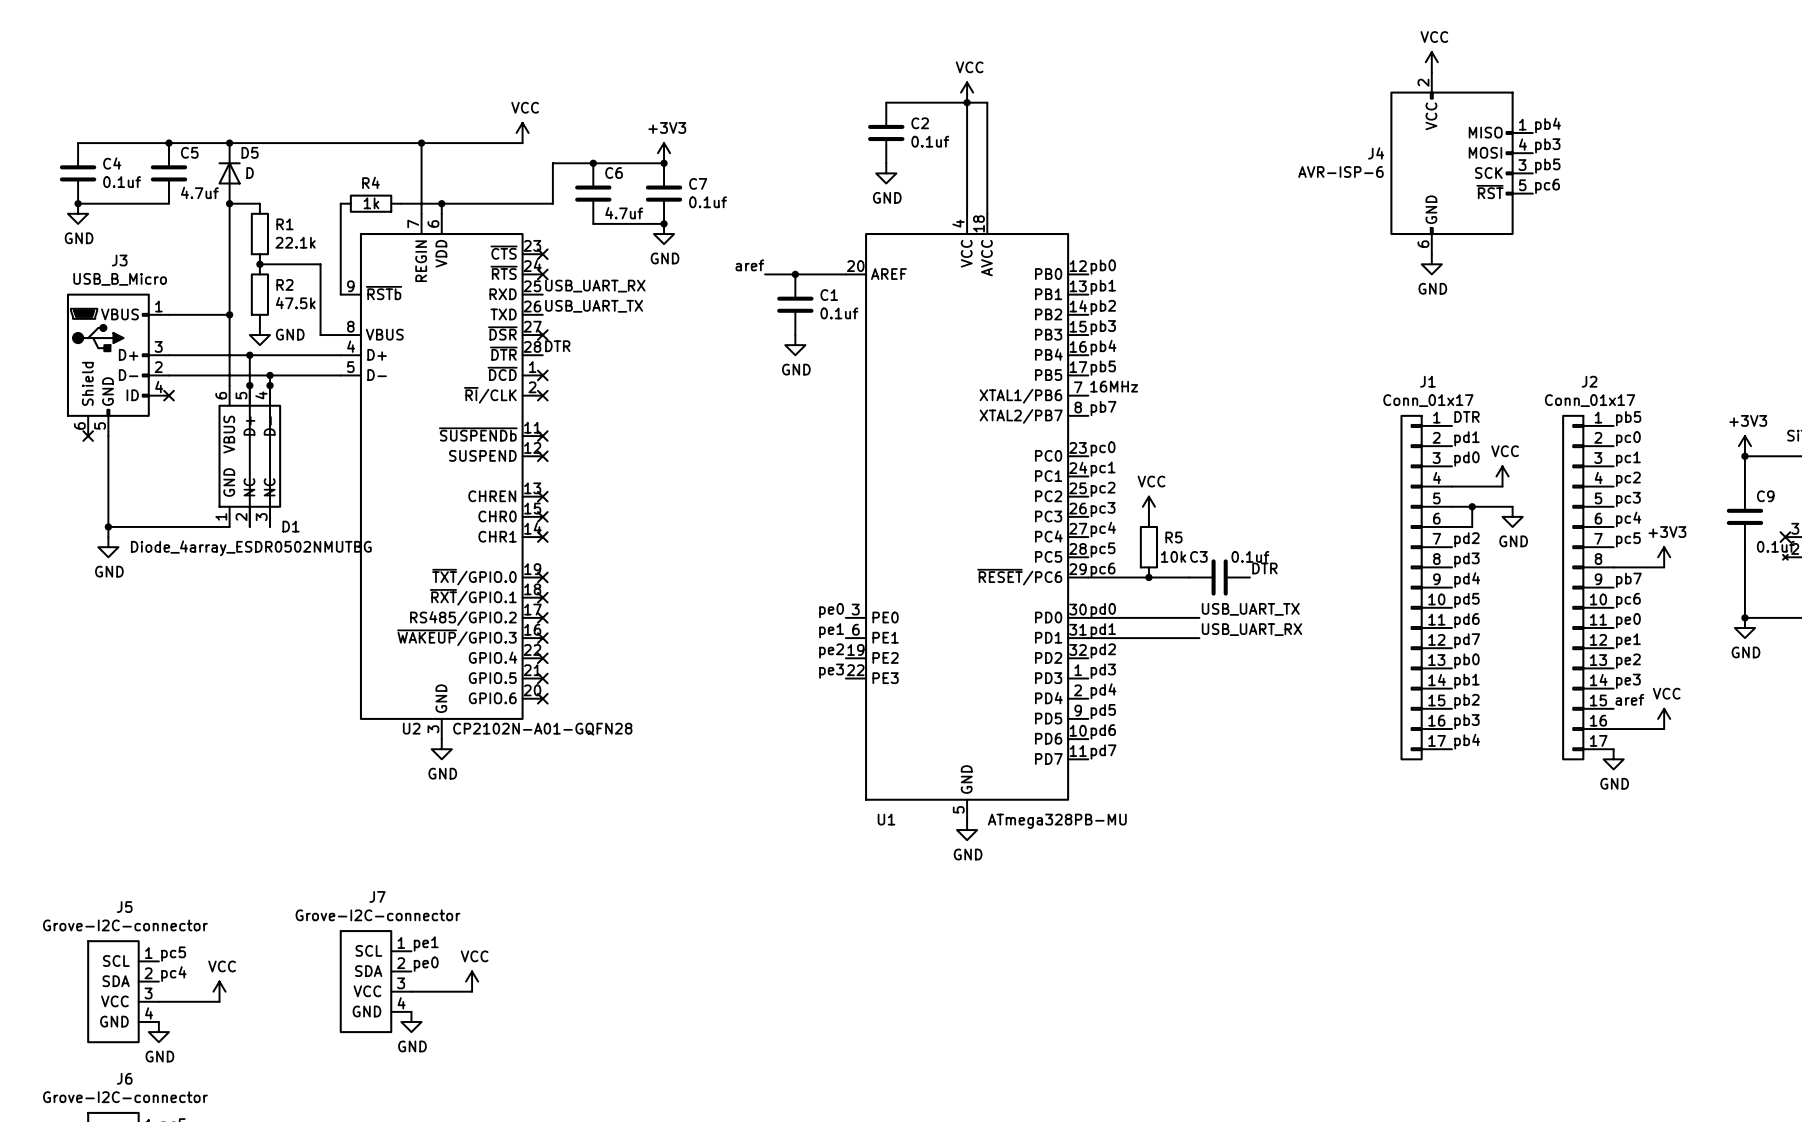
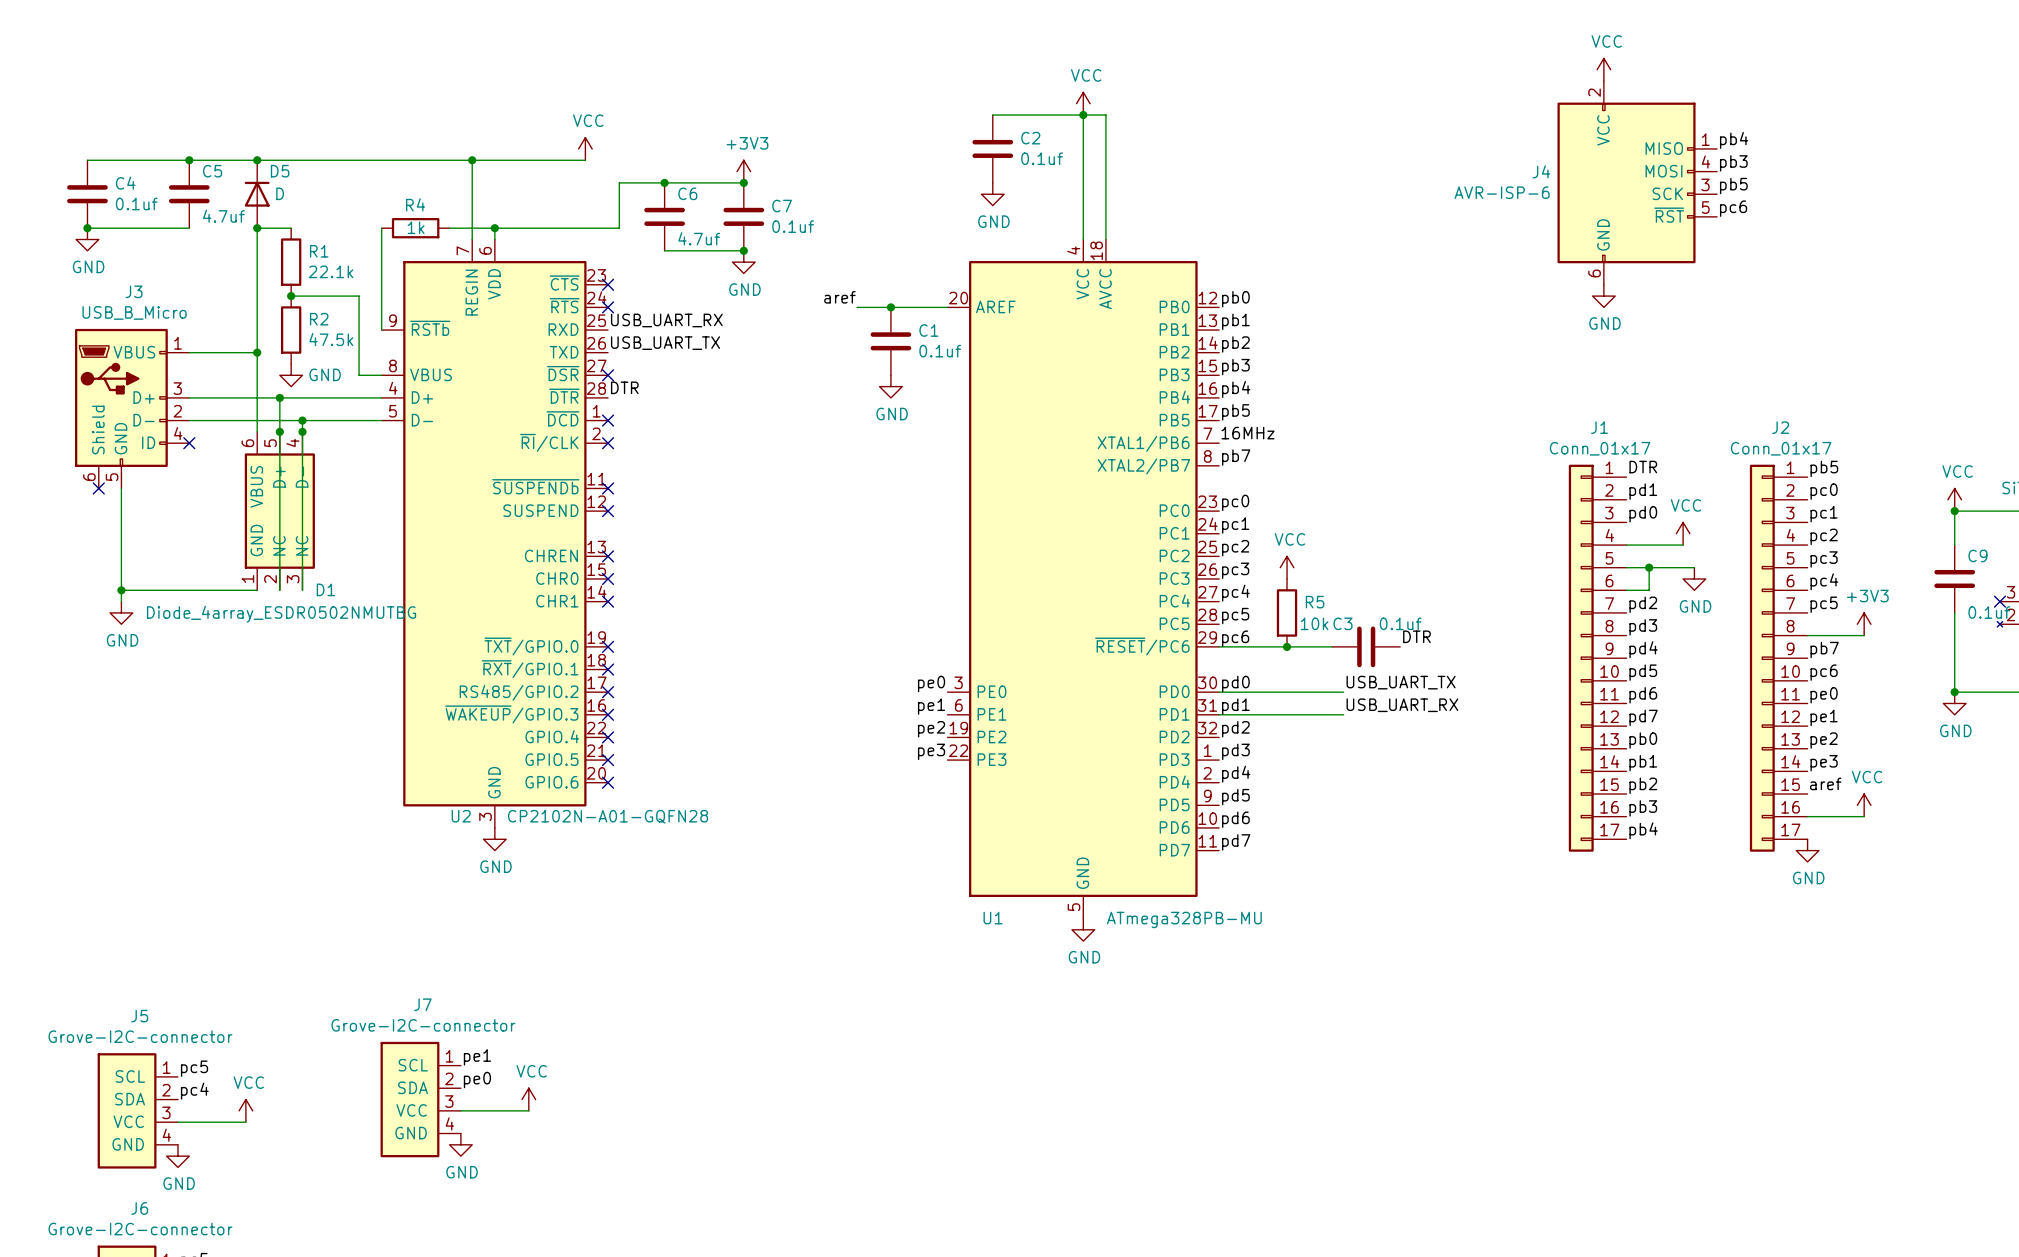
power symbol: +3V3 (1744, 446) -> VCC (1954, 499)

